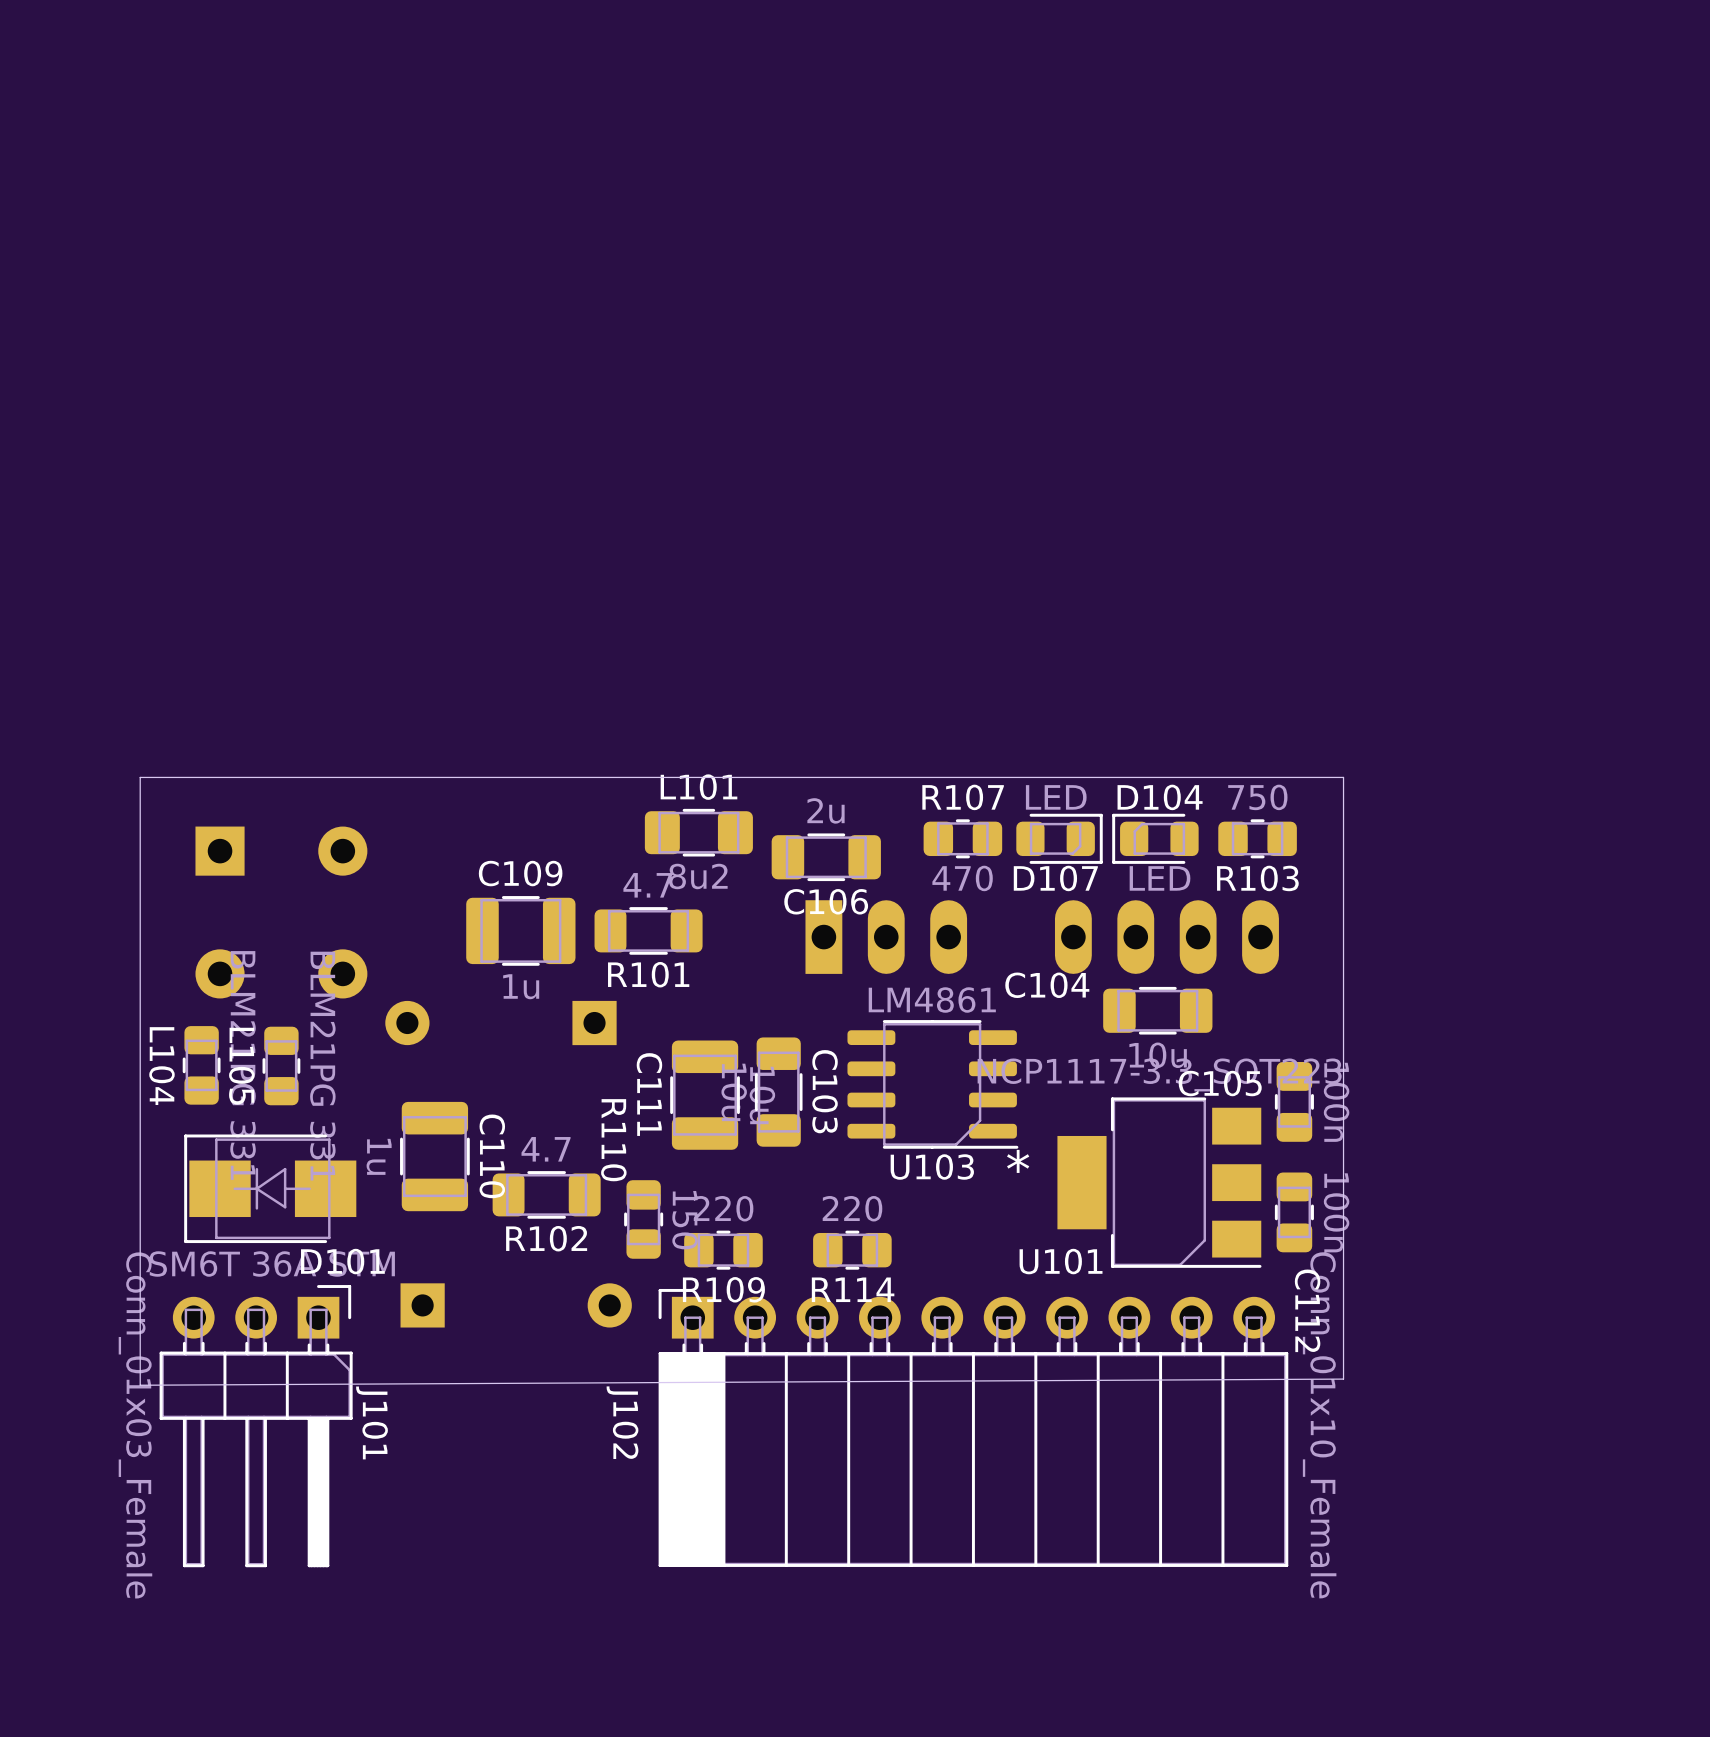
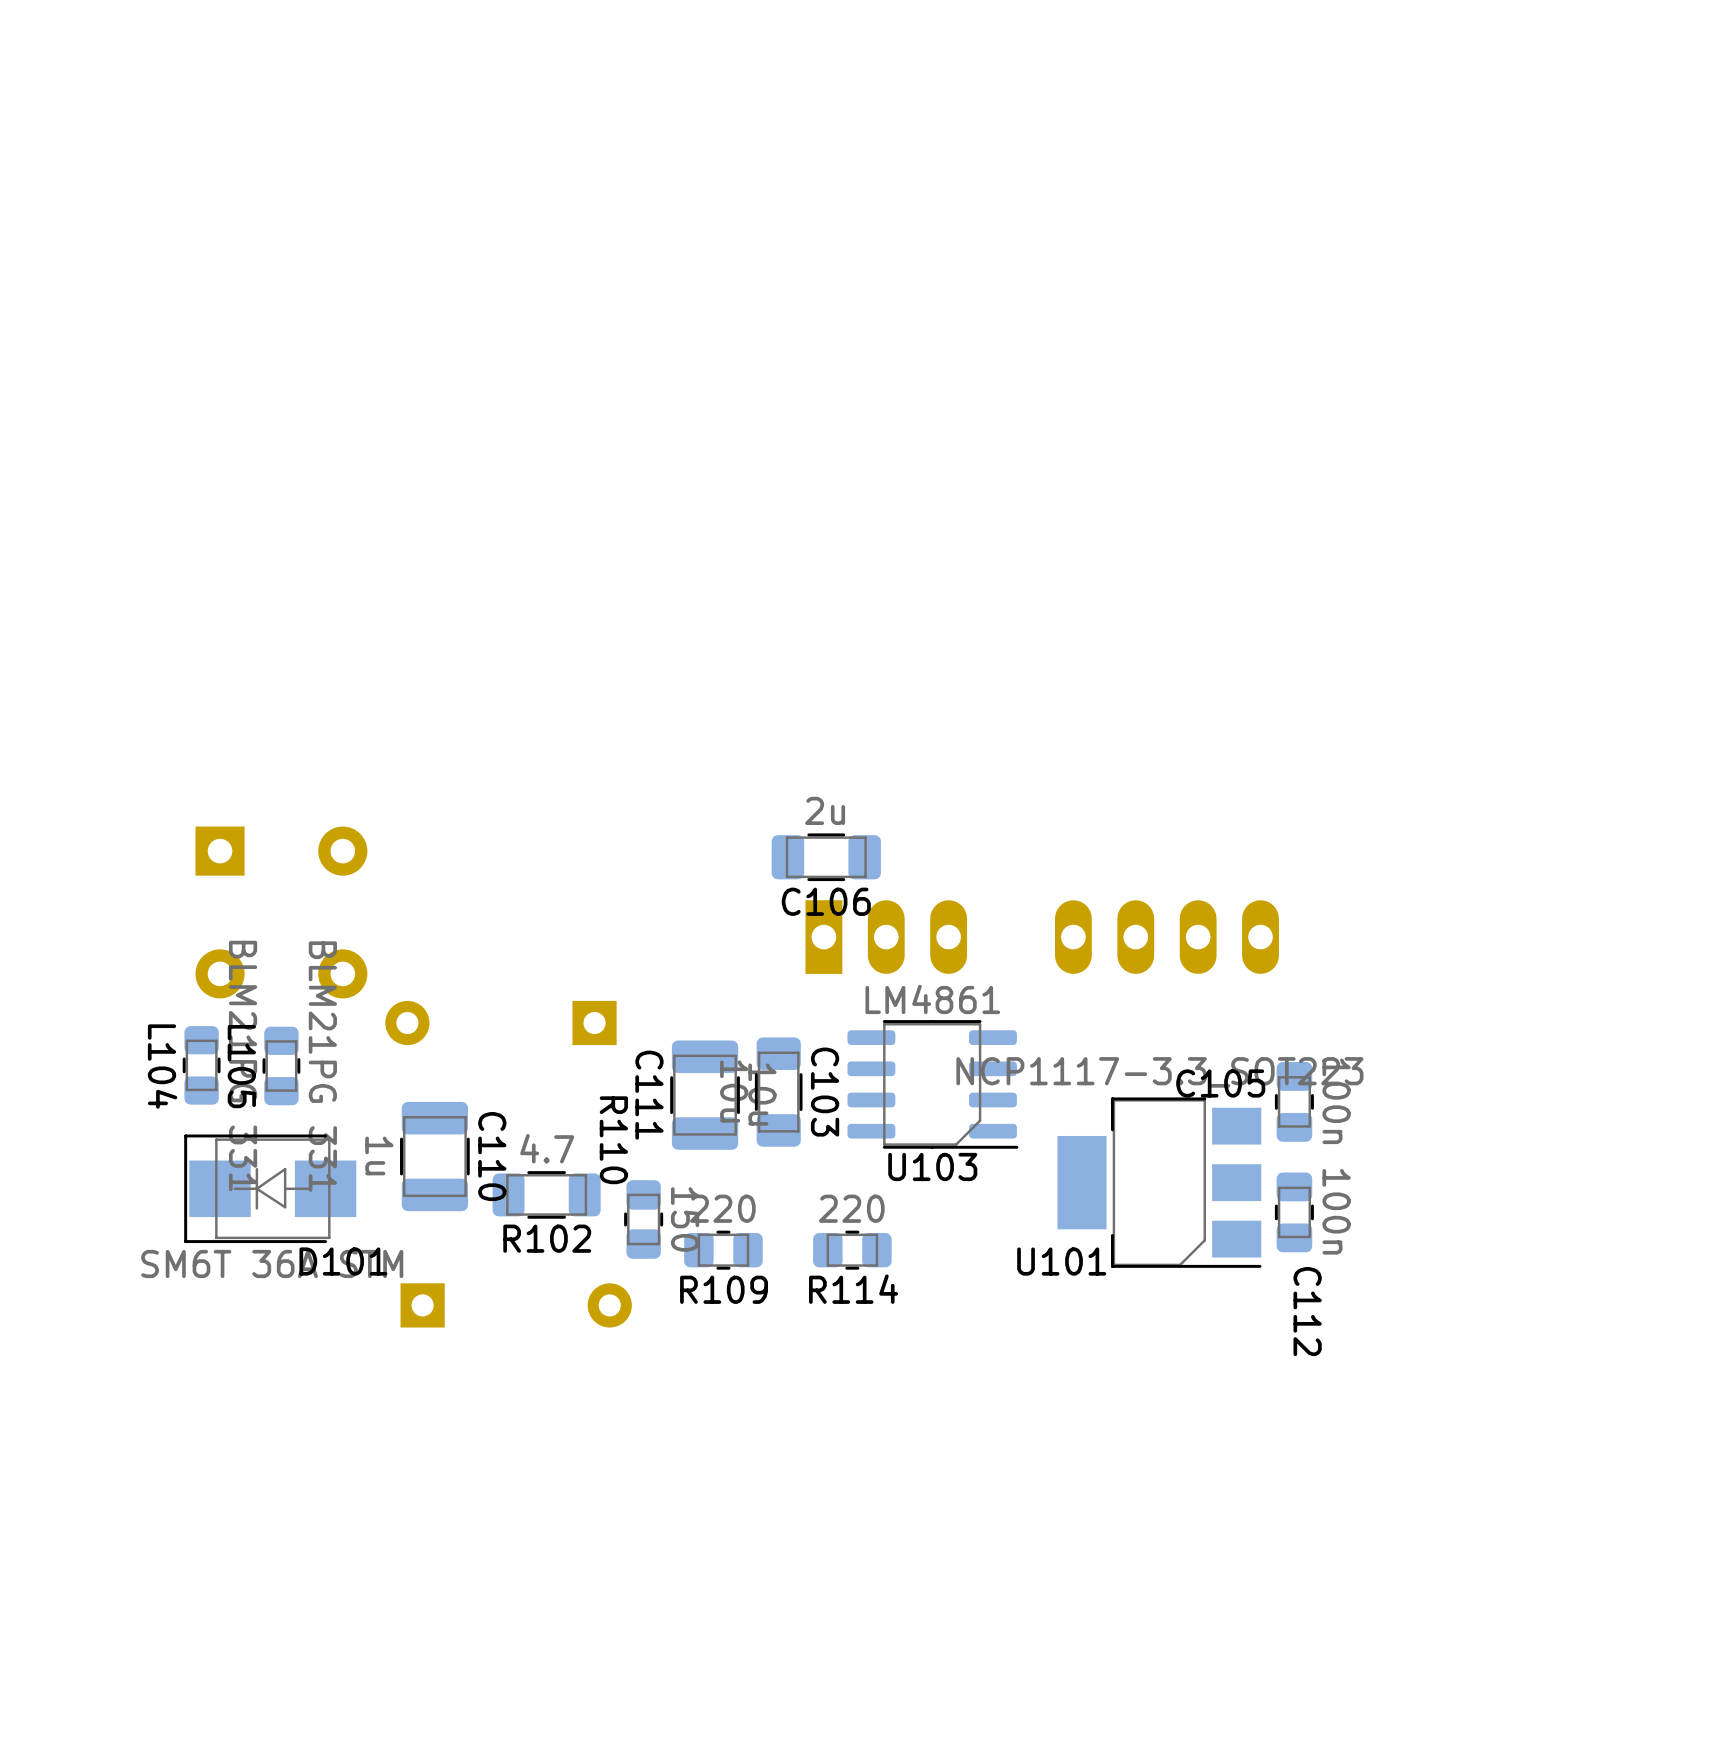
board edge: (1343, 777) (1343, 1379) (140, 1385) (140, 777) (1343, 777) -> none
L101: 8u2 (698, 832) -> none
R107: 470 (962, 838) -> none
D107: LED (1059, 838) -> none
D104: LED (1155, 838) -> none
R103: 750 (1257, 838) -> none
C109: 1u (520, 930) -> none
R101: 4.7 (648, 930) -> none
C104: 10u (1157, 1010) -> none
text: * (1018, 1161) -> none
J101: Conn_01x03_Female (256, 1426) -> none
J102: Conn_01x10_Female (973, 1427) -> none

